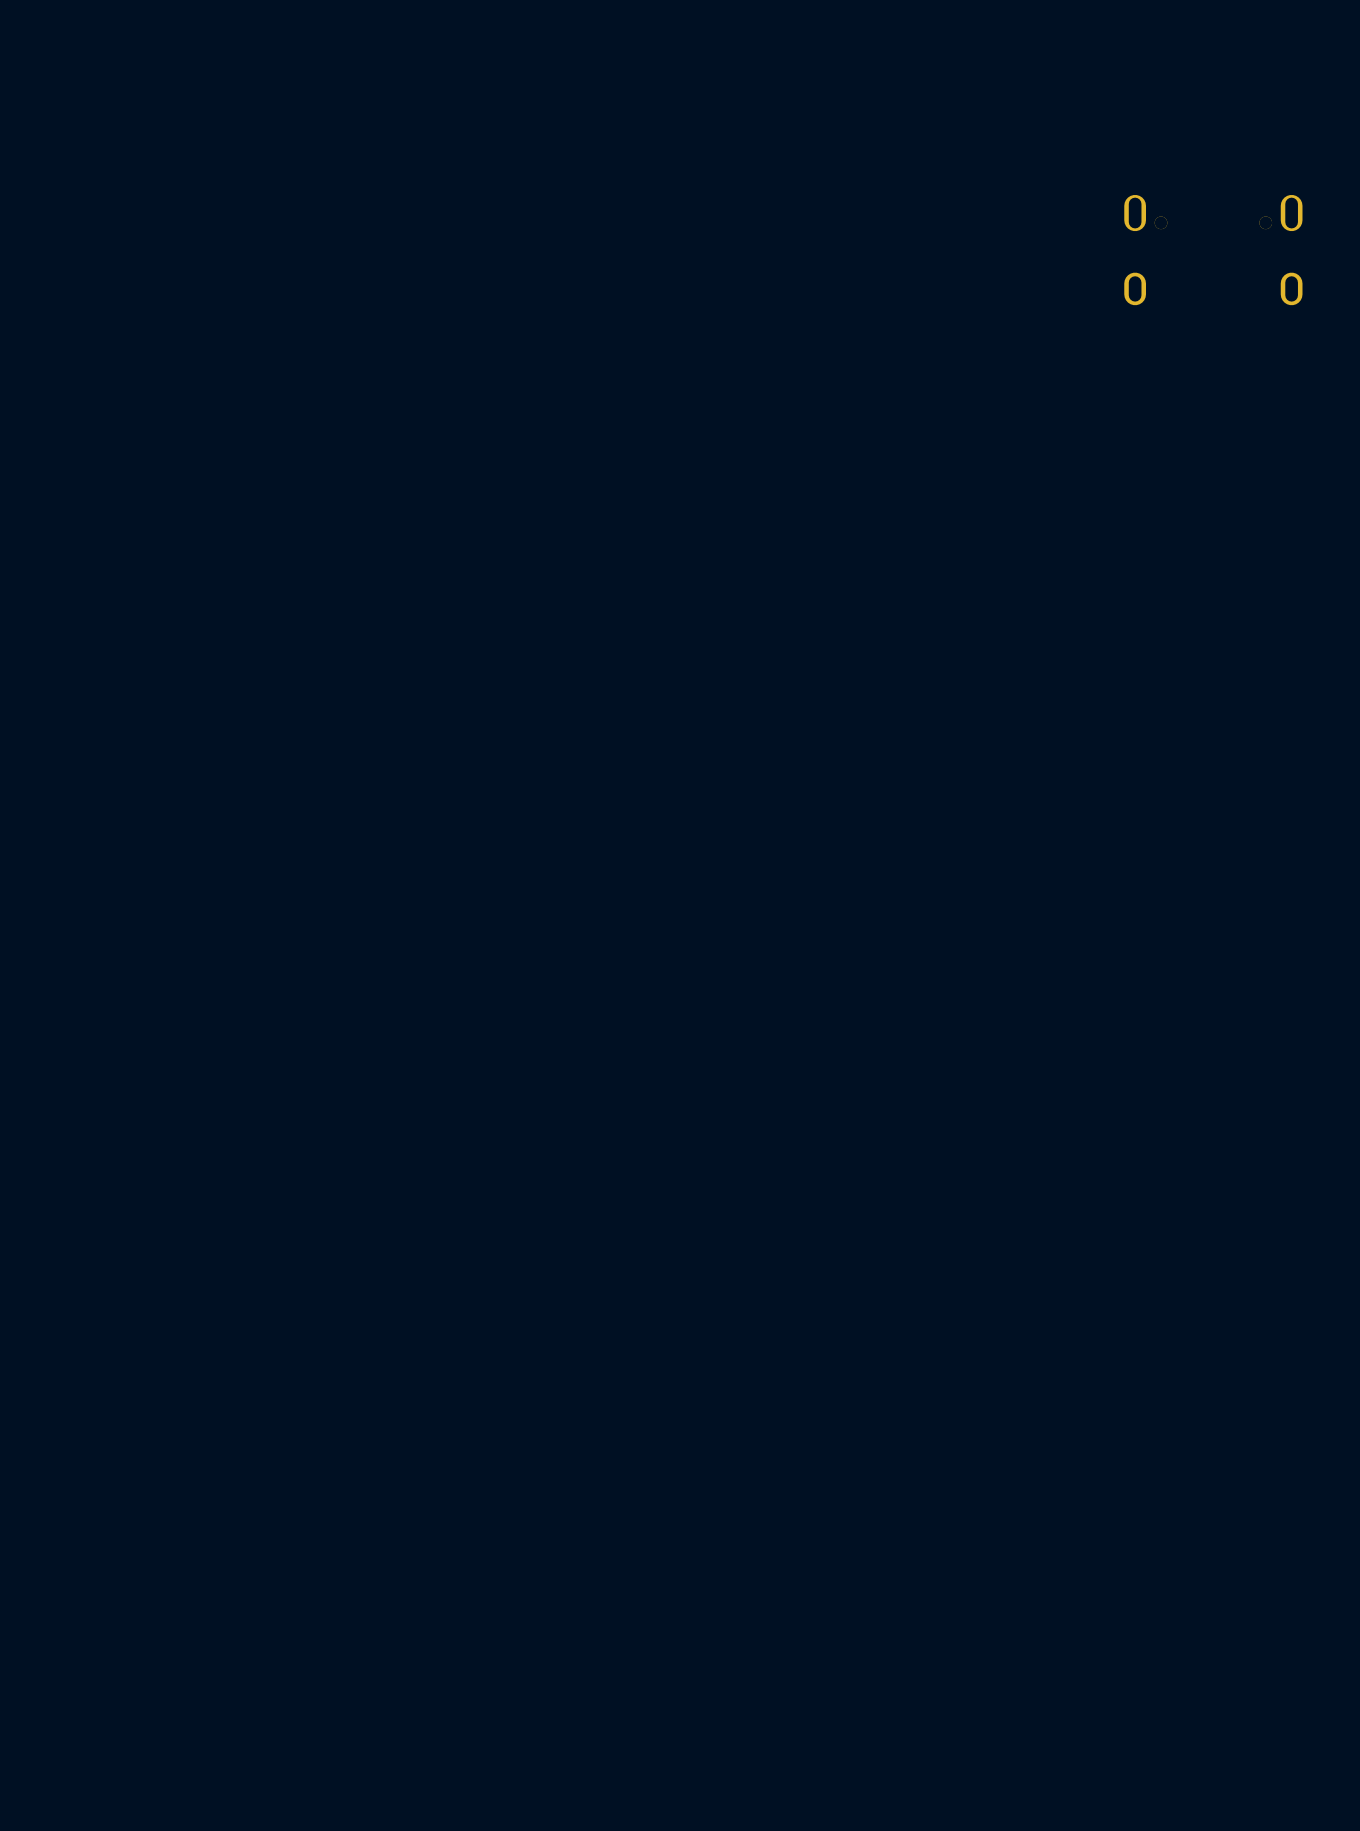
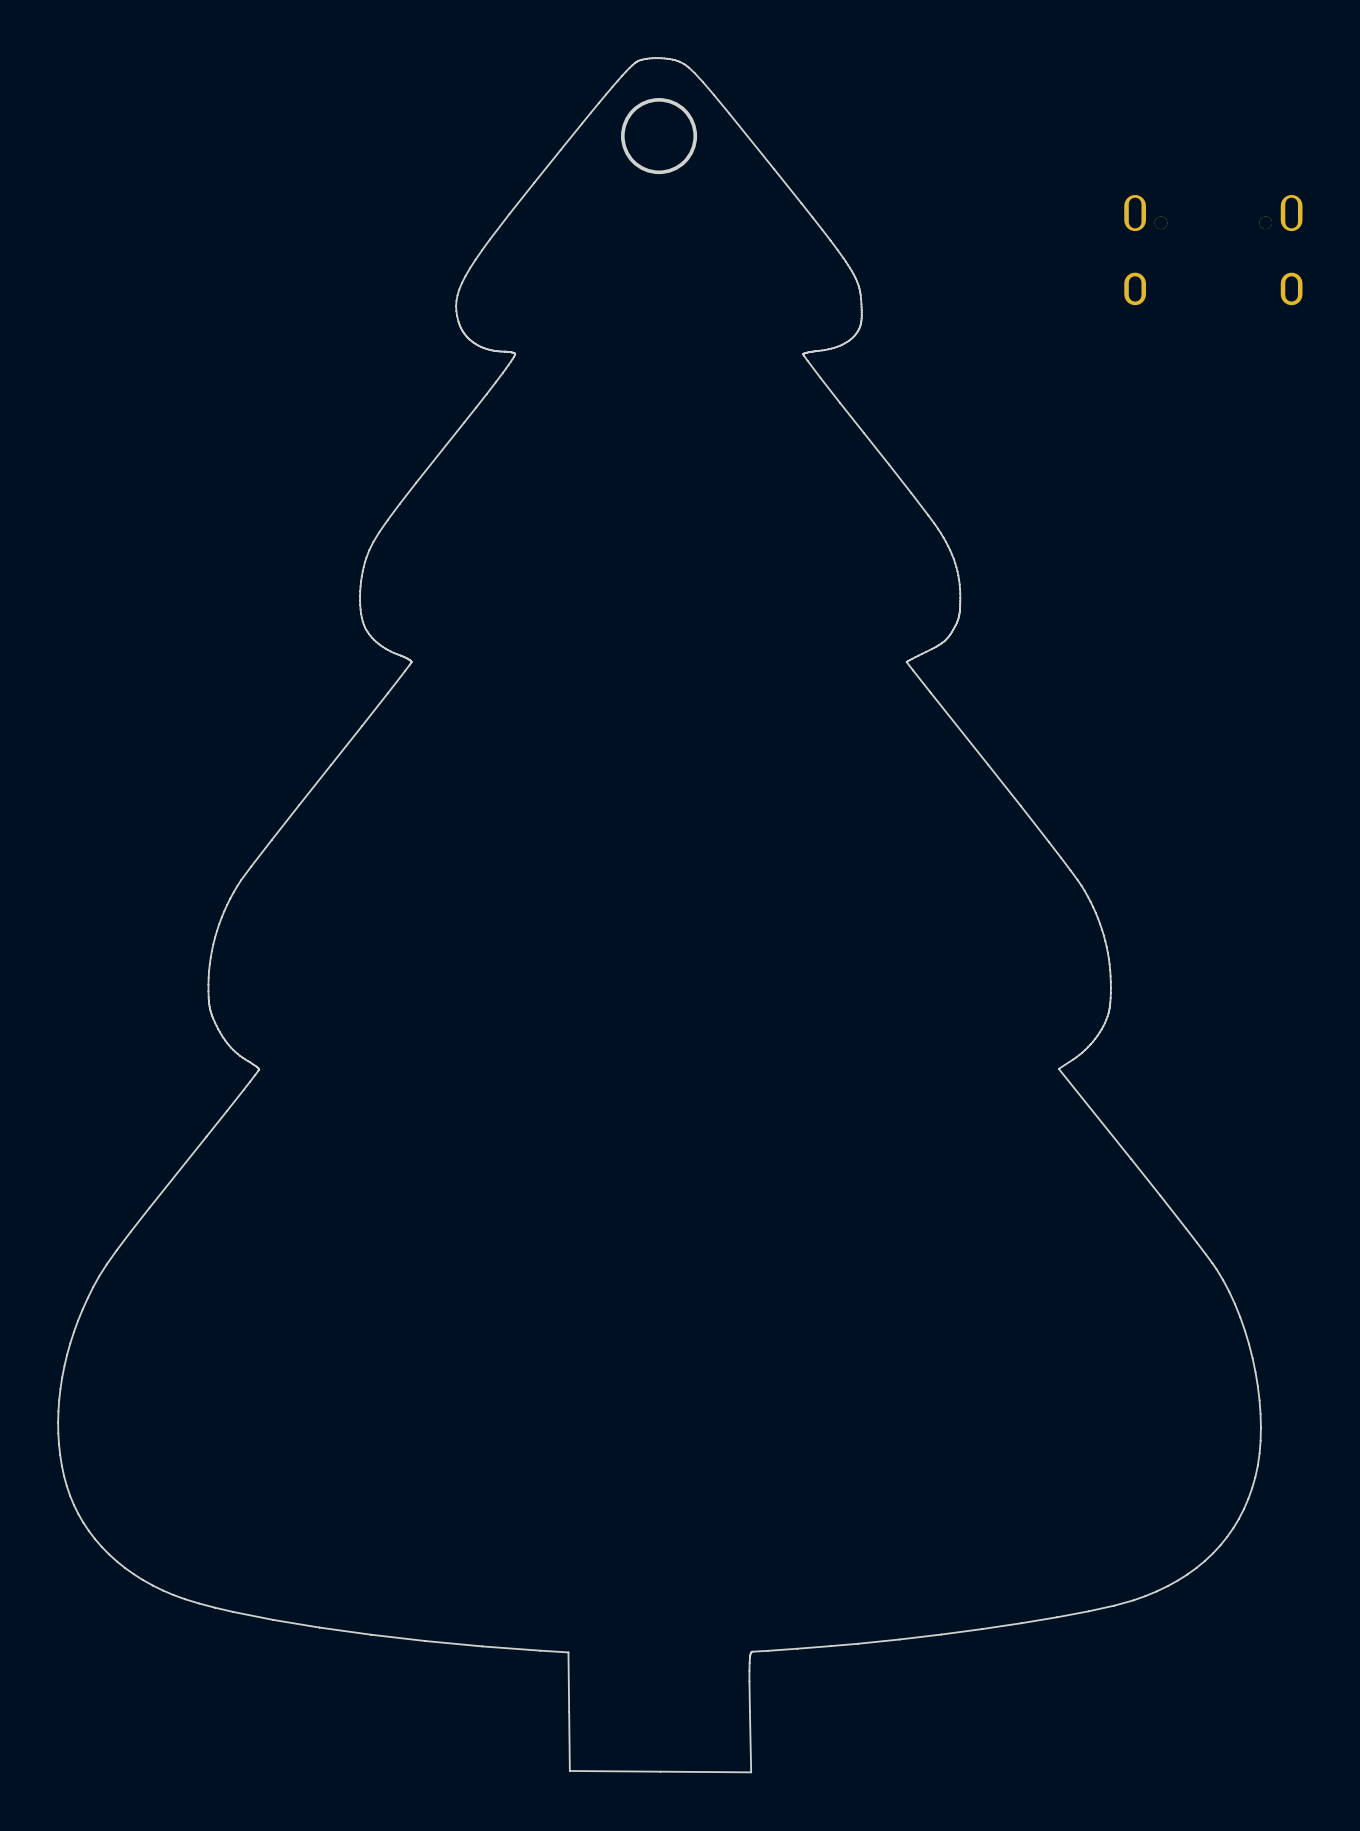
round board edge: none -> [621, 98, 698, 175]
board edge: none -> (803, 353) (840, 345) (851, 339) (857, 332) (861, 321) (861, 307) (859, 290) (854, 276) (822, 229) (703, 82) (683, 63) (672, 59) (658, 58) (637, 61) (617, 80) (509, 214) (475, 259) (461, 283) (457, 295) (456, 311) (459, 324) (464, 333) (471, 341) (482, 347) (515, 353)
board edge: none -> (515, 354) (495, 382) (387, 519) (373, 541) (366, 557) (360, 591) (360, 609) (363, 624) (369, 634) (378, 643) (411, 661)
board edge: none -> (803, 354) (934, 523) (946, 541) (955, 563) (960, 598) (959, 614) (956, 624) (942, 643) (906, 661)
board edge: none -> (411, 662) (251, 866) (233, 892) (221, 917) (209, 964) (208, 991) (210, 1010) (218, 1029) (229, 1045) (259, 1068)
board edge: none -> (906, 662) (1060, 857) (1090, 901) (1100, 924) (1107, 952) (1110, 982) (1109, 1010) (1103, 1026) (1092, 1041) (1079, 1055) (1058, 1068) (1216, 1269) (1235, 1304) (1249, 1344) (1257, 1386) (1260, 1427) (1257, 1465) (1252, 1488) (1244, 1508) (1227, 1536) (1205, 1560) (1177, 1580) (1133, 1600) (1057, 1617) (899, 1639) (751, 1651) (749, 1670) (751, 1772) (569, 1770) (568, 1652) (425, 1641) (319, 1627) (214, 1607) (185, 1599) (152, 1585) (125, 1568) (101, 1547) (83, 1522) (70, 1495) (61, 1465) (58, 1433) (59, 1400) (64, 1366) (82, 1309) (106, 1264) (259, 1069)

